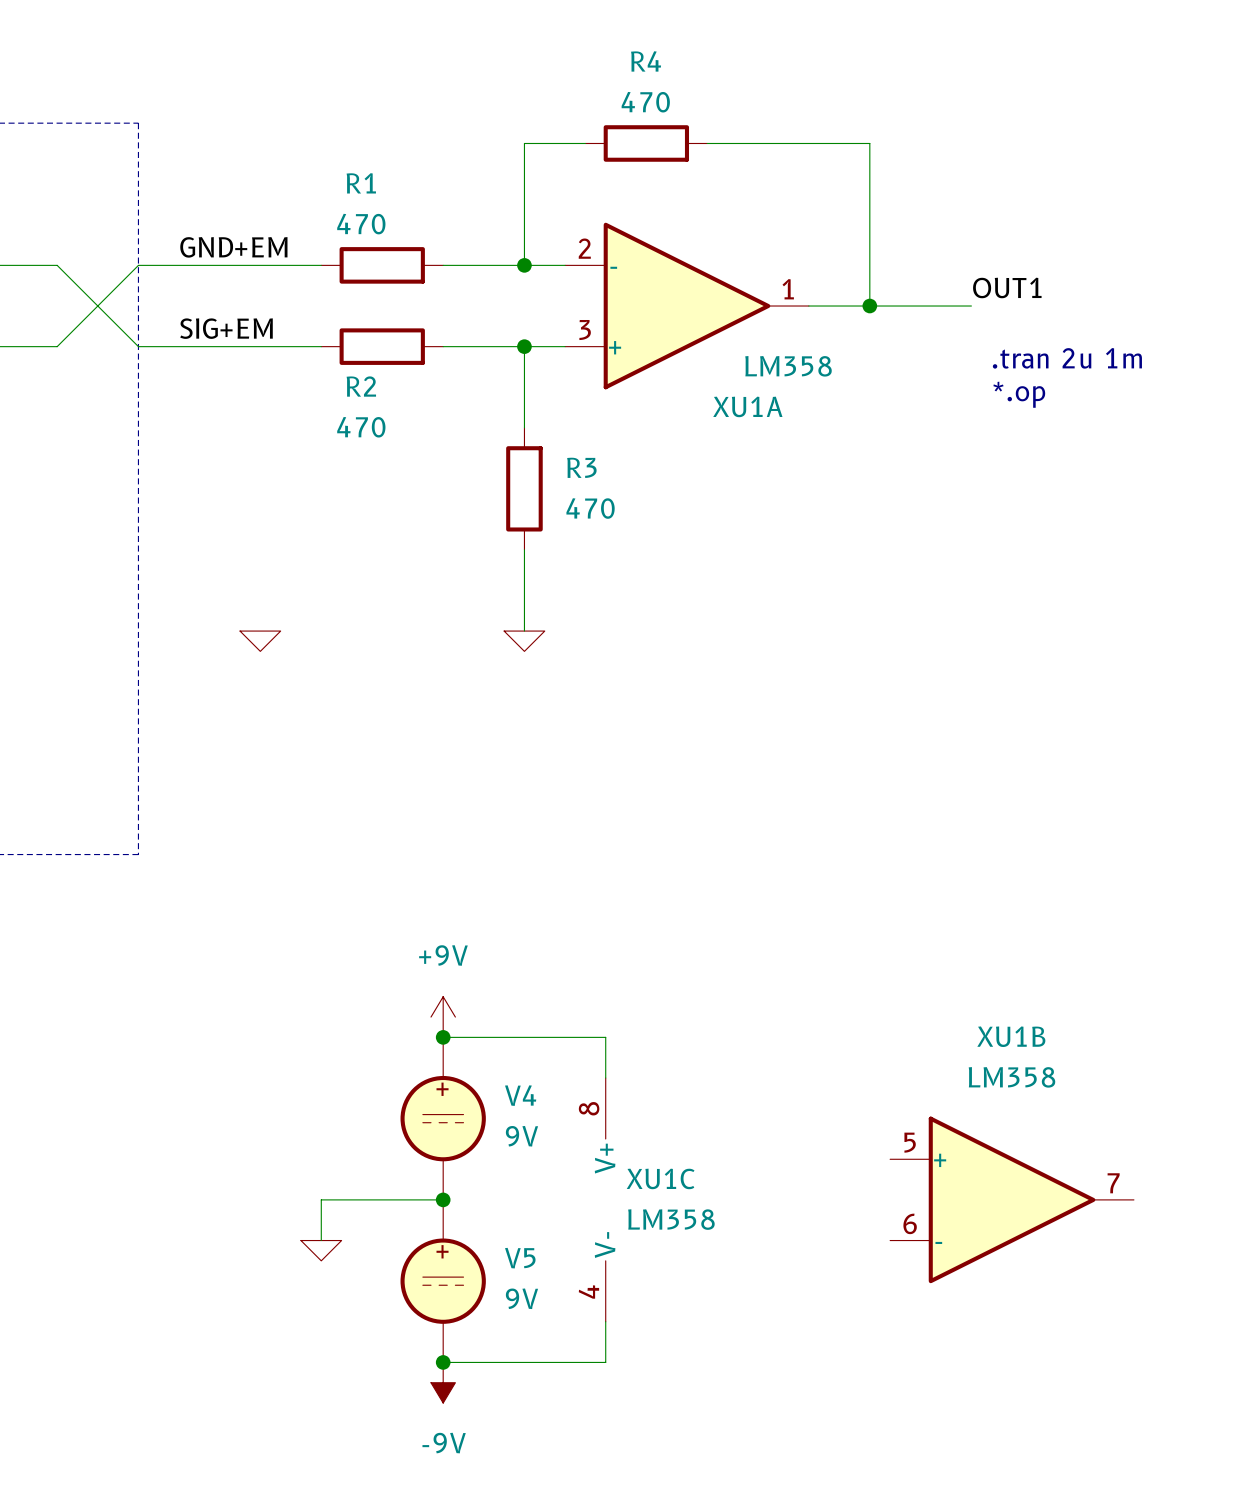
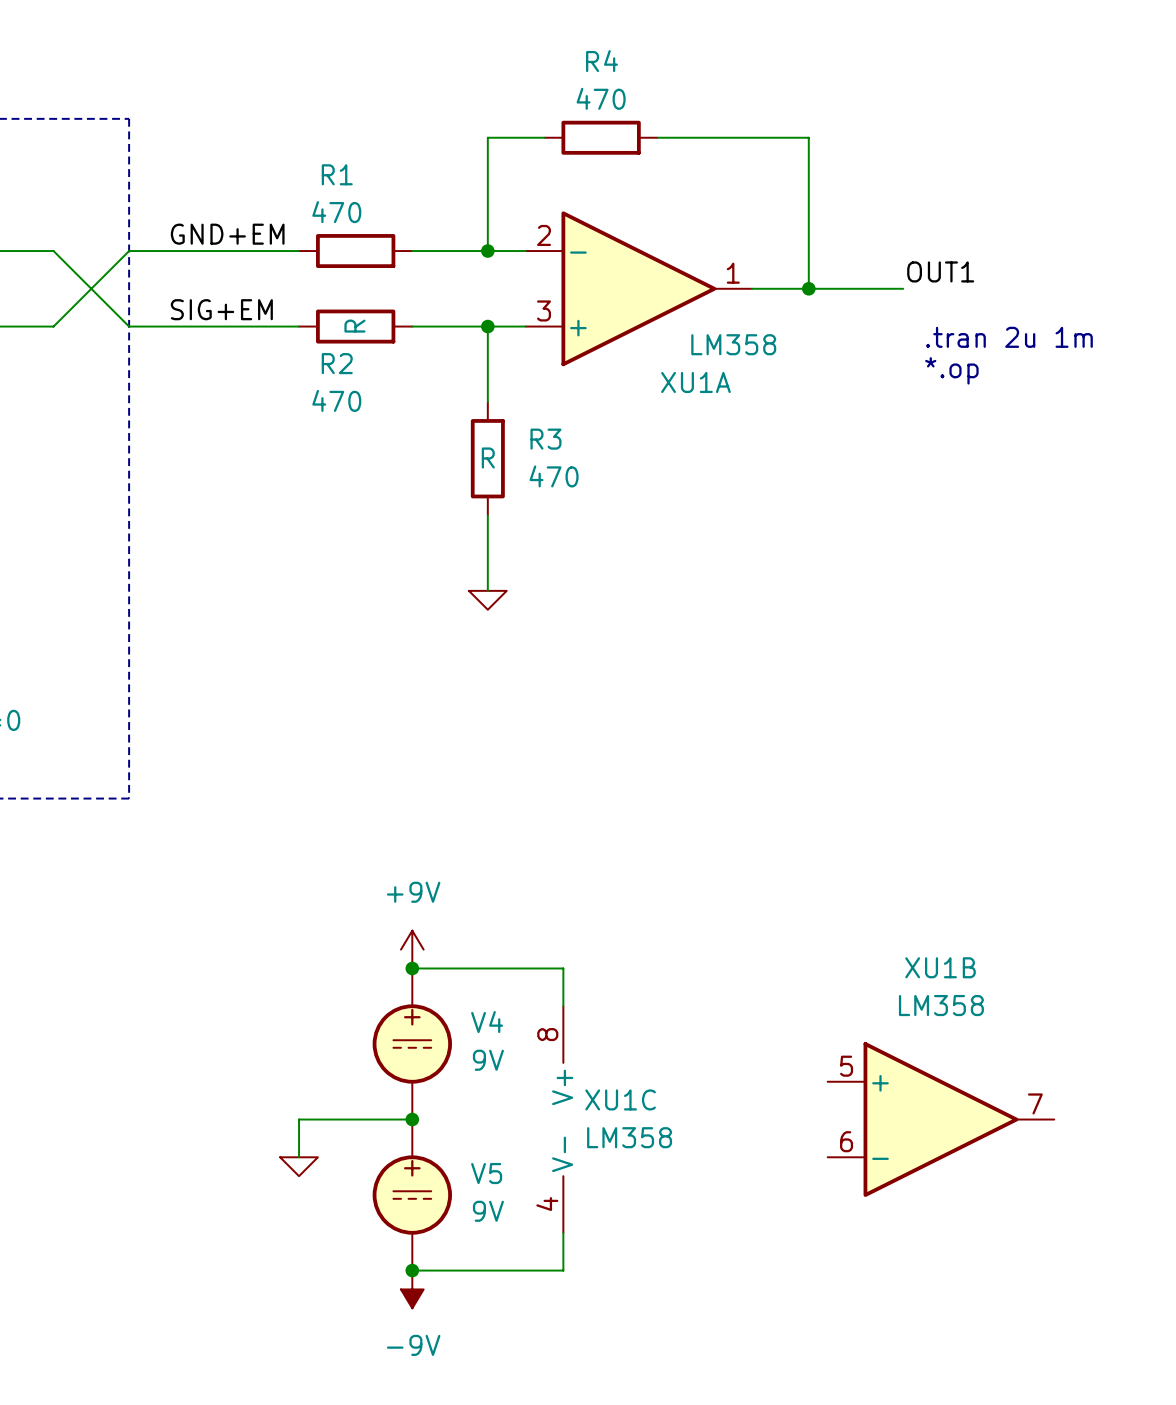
R2 text: none -> R (354, 326)
R3 text: none -> R (488, 458)
power symbol: (260, 641) -> none

